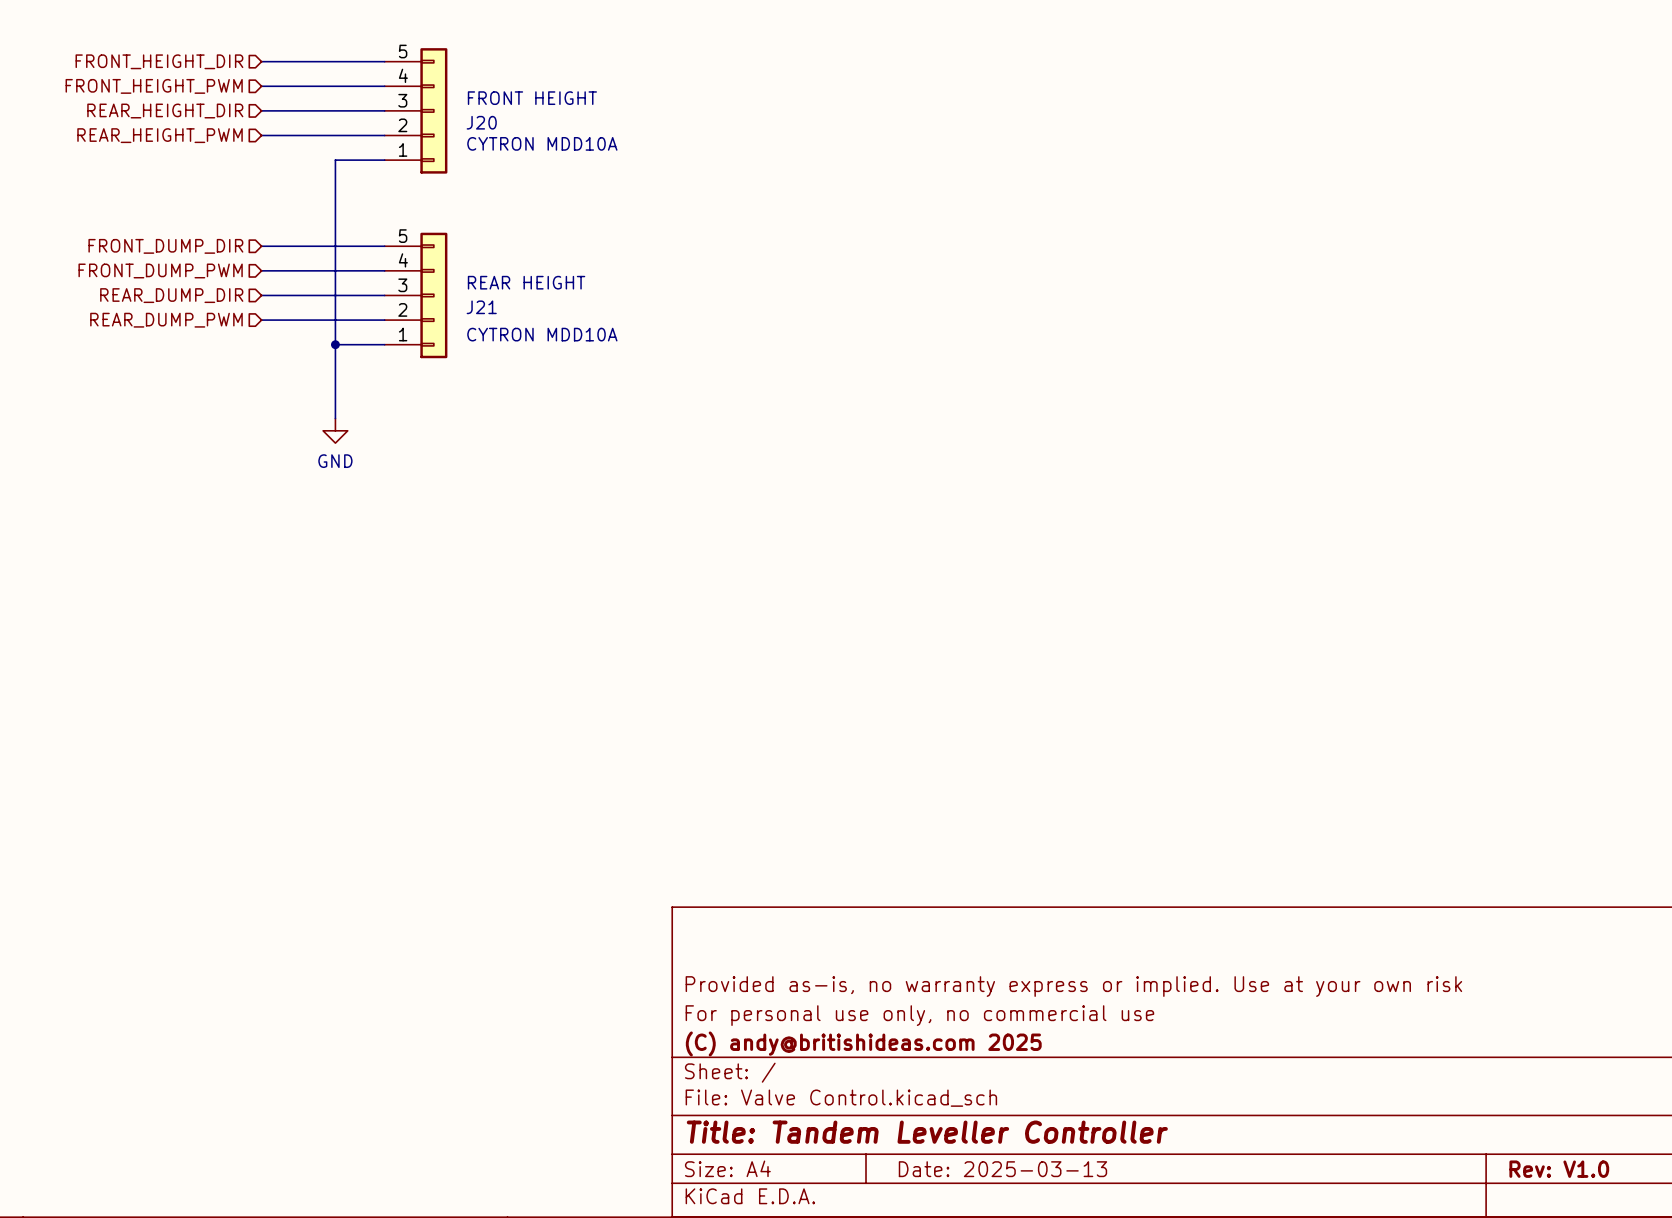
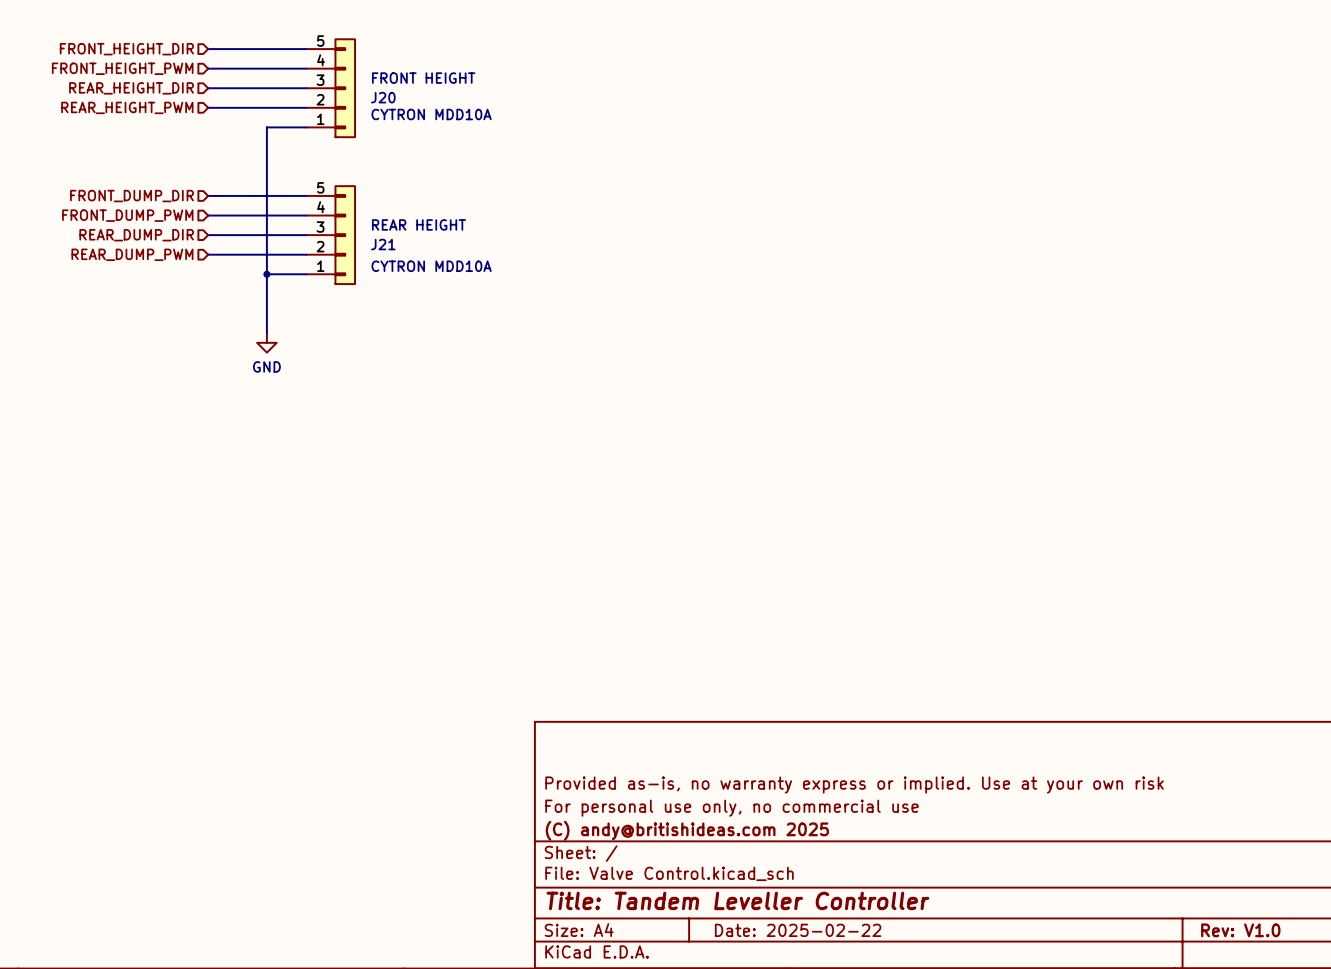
title block: Date: 2025-03-13 (1002, 1169) -> Date: 2025-02-22 (798, 930)

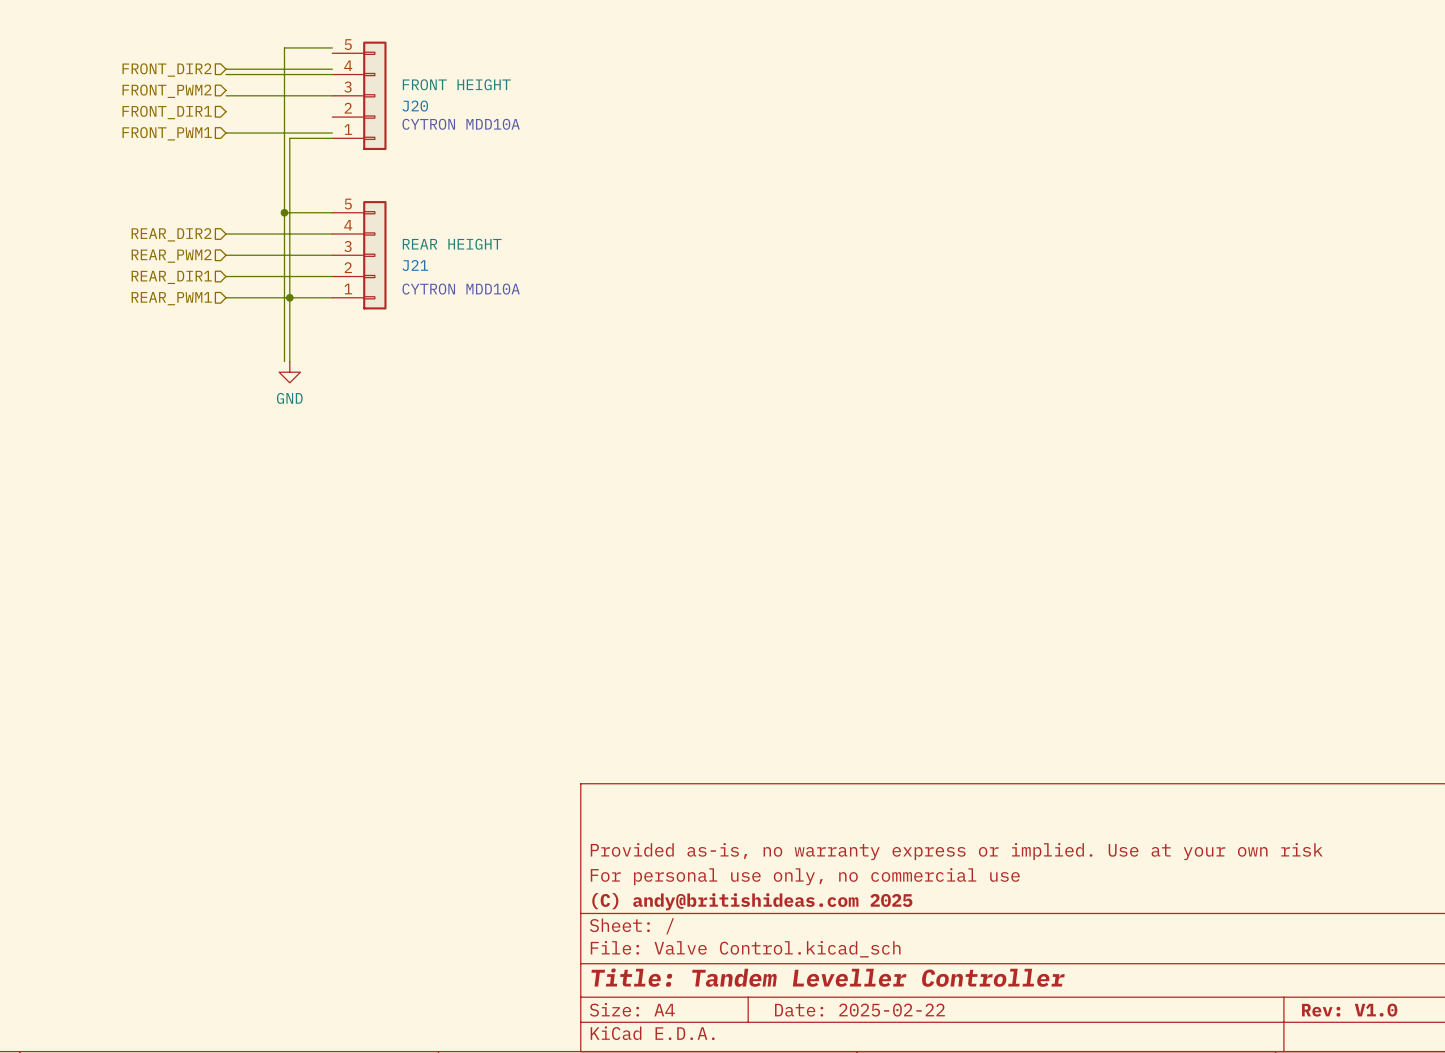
wire: none -> (332, 47) (284, 47) (284, 361)
hierarchical label: FRONT_HEIGHT_DIR (126, 49) -> none
wire: (208, 49) (306, 49) -> (226, 69) (332, 69)
hierarchical label: FRONT_HEIGHT_PWM (122, 68) -> FRONT_DIR2 (167, 70)
hierarchical label: REAR_HEIGHT_DIR (131, 88) -> FRONT_PWM2 (167, 91)
hierarchical label: REAR_HEIGHT_PWM (127, 107) -> FRONT_DIR1 (167, 112)
wire: (208, 107) (306, 107) -> (226, 133) (332, 133)
hierarchical label: none -> FRONT_PWM1 (167, 133)
wire: (208, 195) (262, 195) -> none
junction: none -> (284, 212)
hierarchical label: FRONT_DUMP_DIR (132, 196) -> none
hierarchical label: FRONT_DUMP_PWM (127, 215) -> REAR_DIR2 (171, 234)
hierarchical label: REAR_DUMP_DIR (136, 235) -> REAR_PWM2 (171, 256)
hierarchical label: REAR_DUMP_PWM (132, 254) -> REAR_DIR1 (171, 277)
hierarchical label: none -> REAR_PWM1 (171, 298)
wire: none -> (226, 297) (289, 297)

